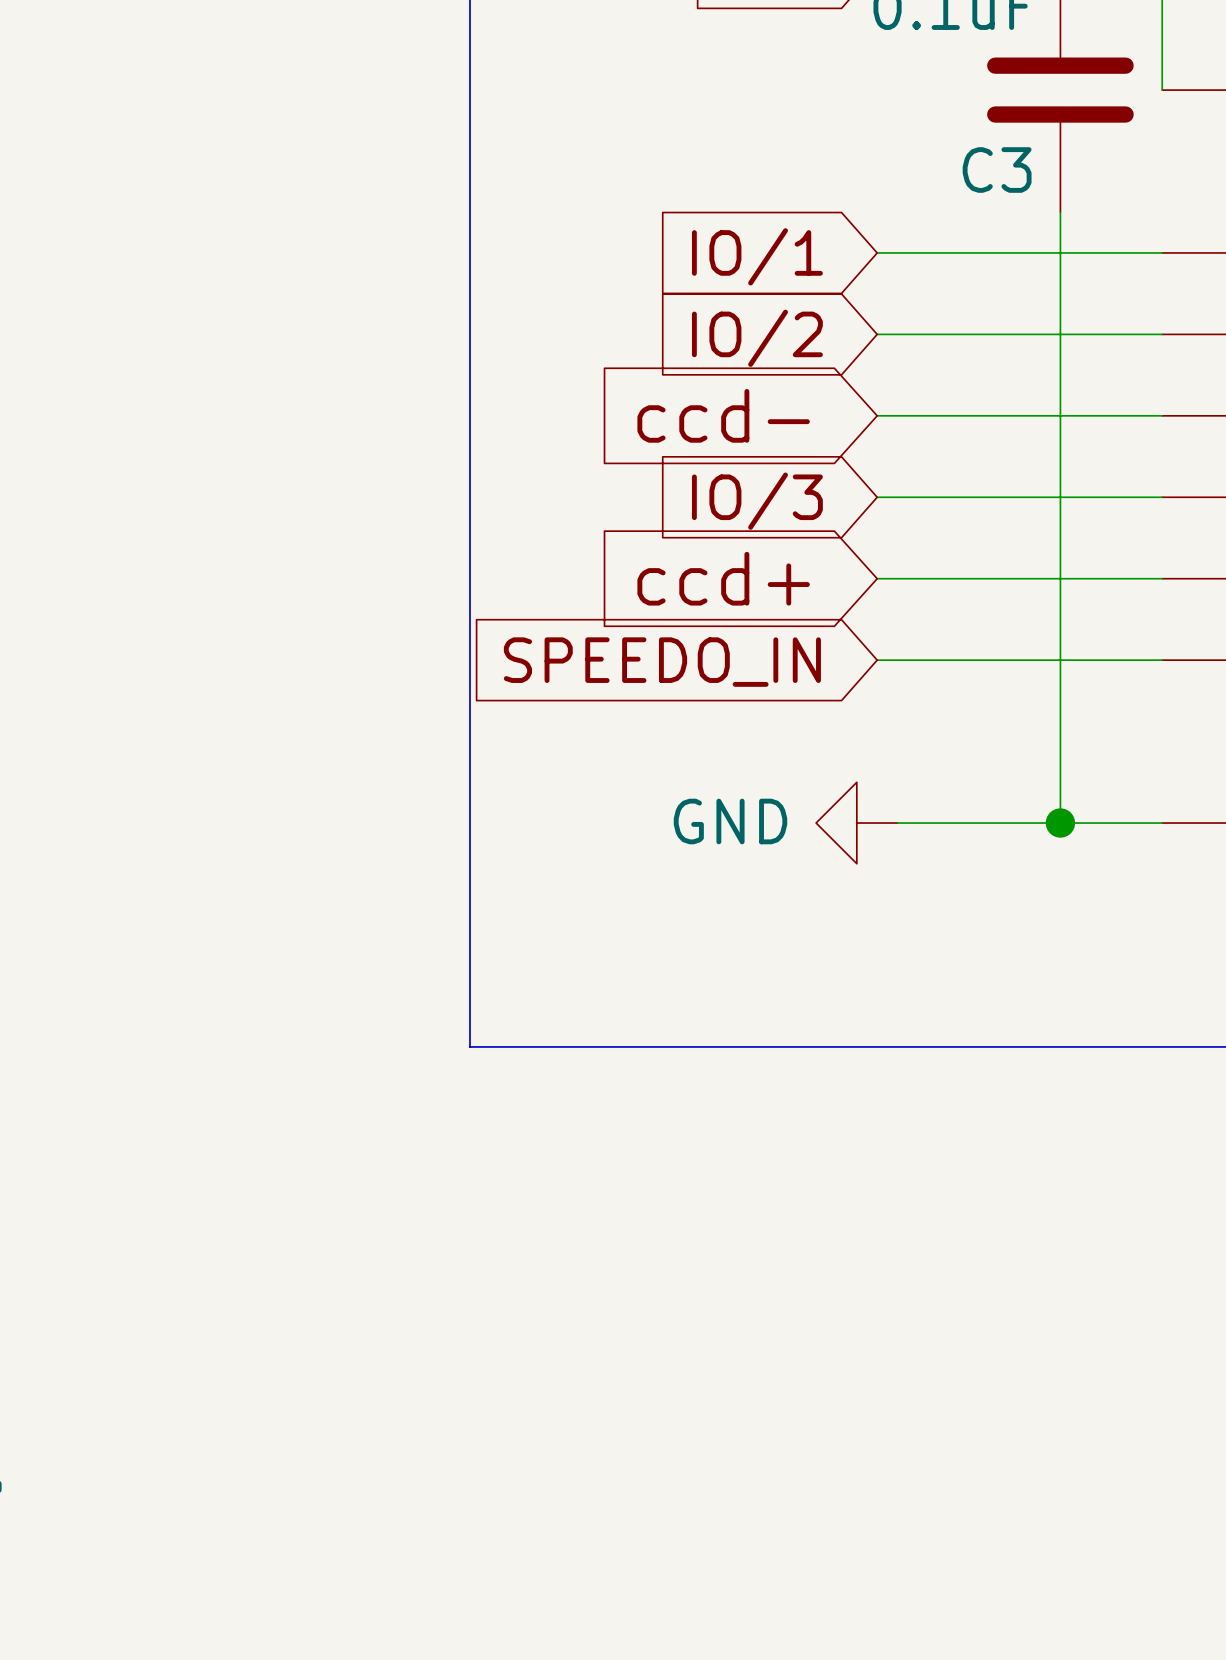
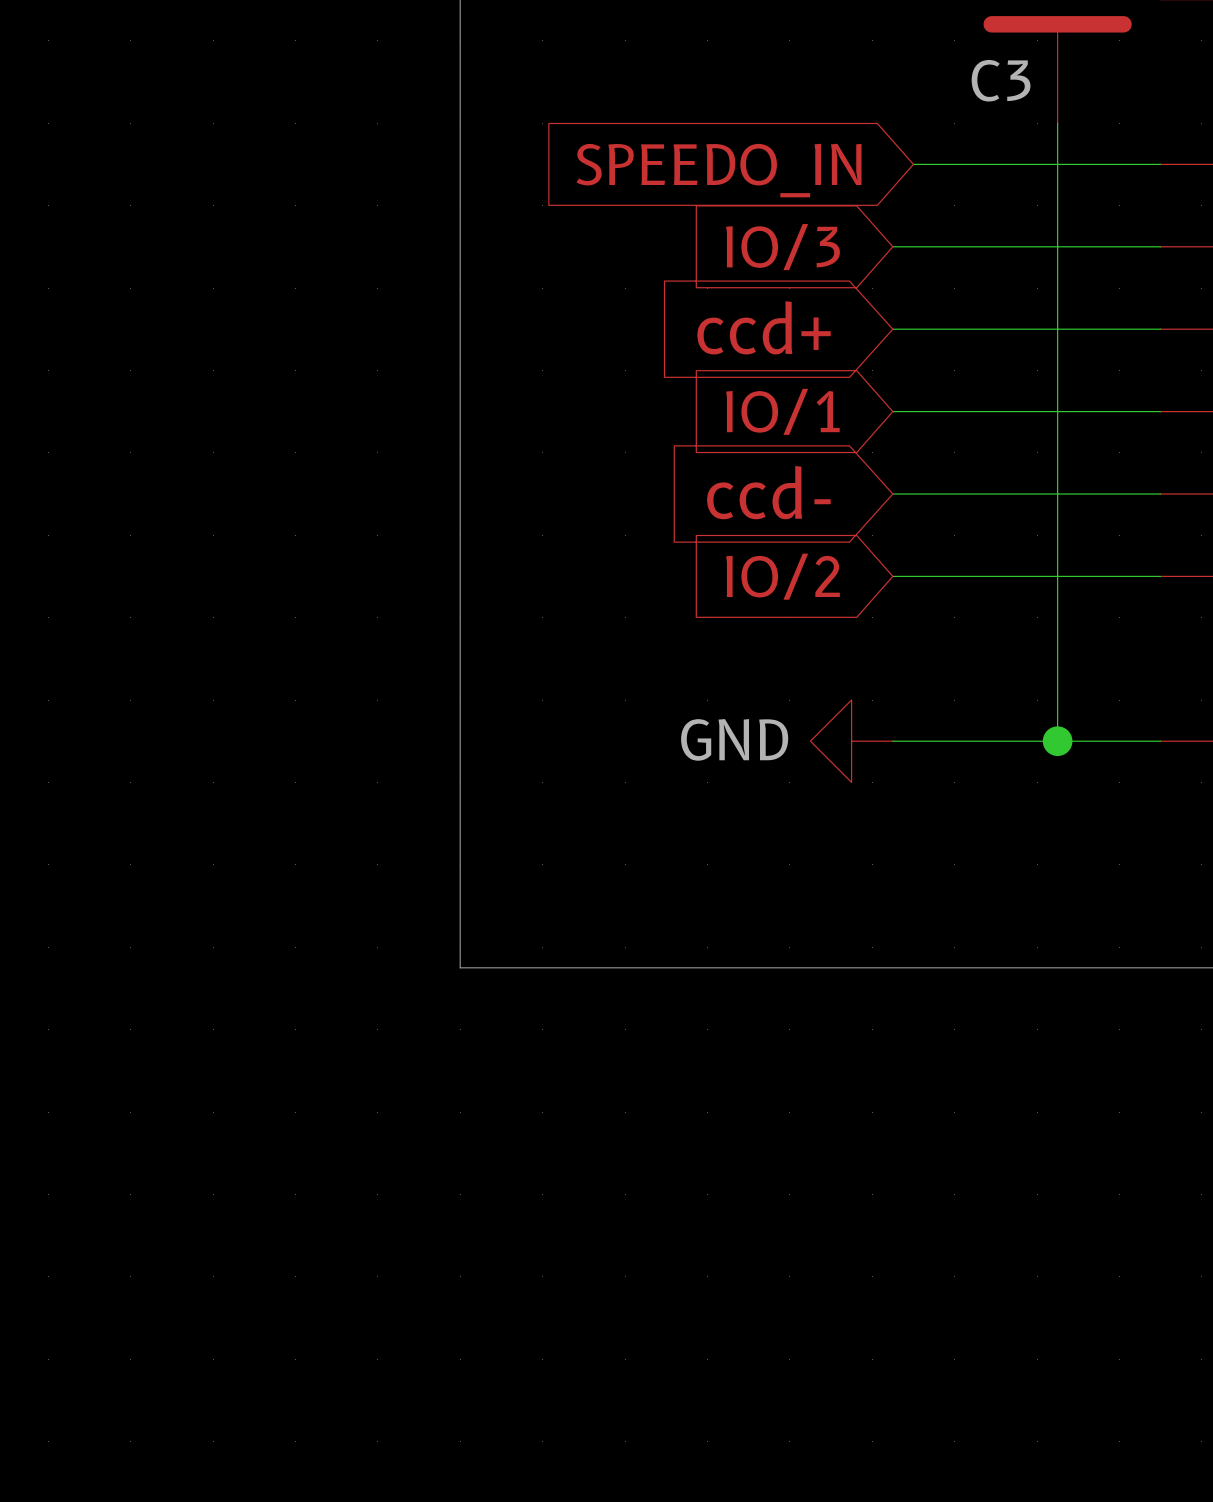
wire: (877, 252) (917, 252) -> none
global label position: IO/1 (757, 256) -> IO/1 (782, 411)
wire: (877, 334) (897, 334) -> none
global label position: IO/2 (757, 338) -> IO/2 (782, 576)
global label position: ccd- (723, 415) -> ccd- (768, 492)
wire: (877, 415) (897, 415) -> none
wire: (877, 497) (897, 497) -> none
global label position: IO/3 (757, 501) -> IO/3 (783, 247)
global label position: ccd+ (723, 578) -> ccd+ (764, 327)
wire: (877, 578) (897, 578) -> none
wire: (877, 660) (897, 660) -> none
global label position: SPEEDO_IN (662, 662) -> SPEEDO_IN (719, 170)

